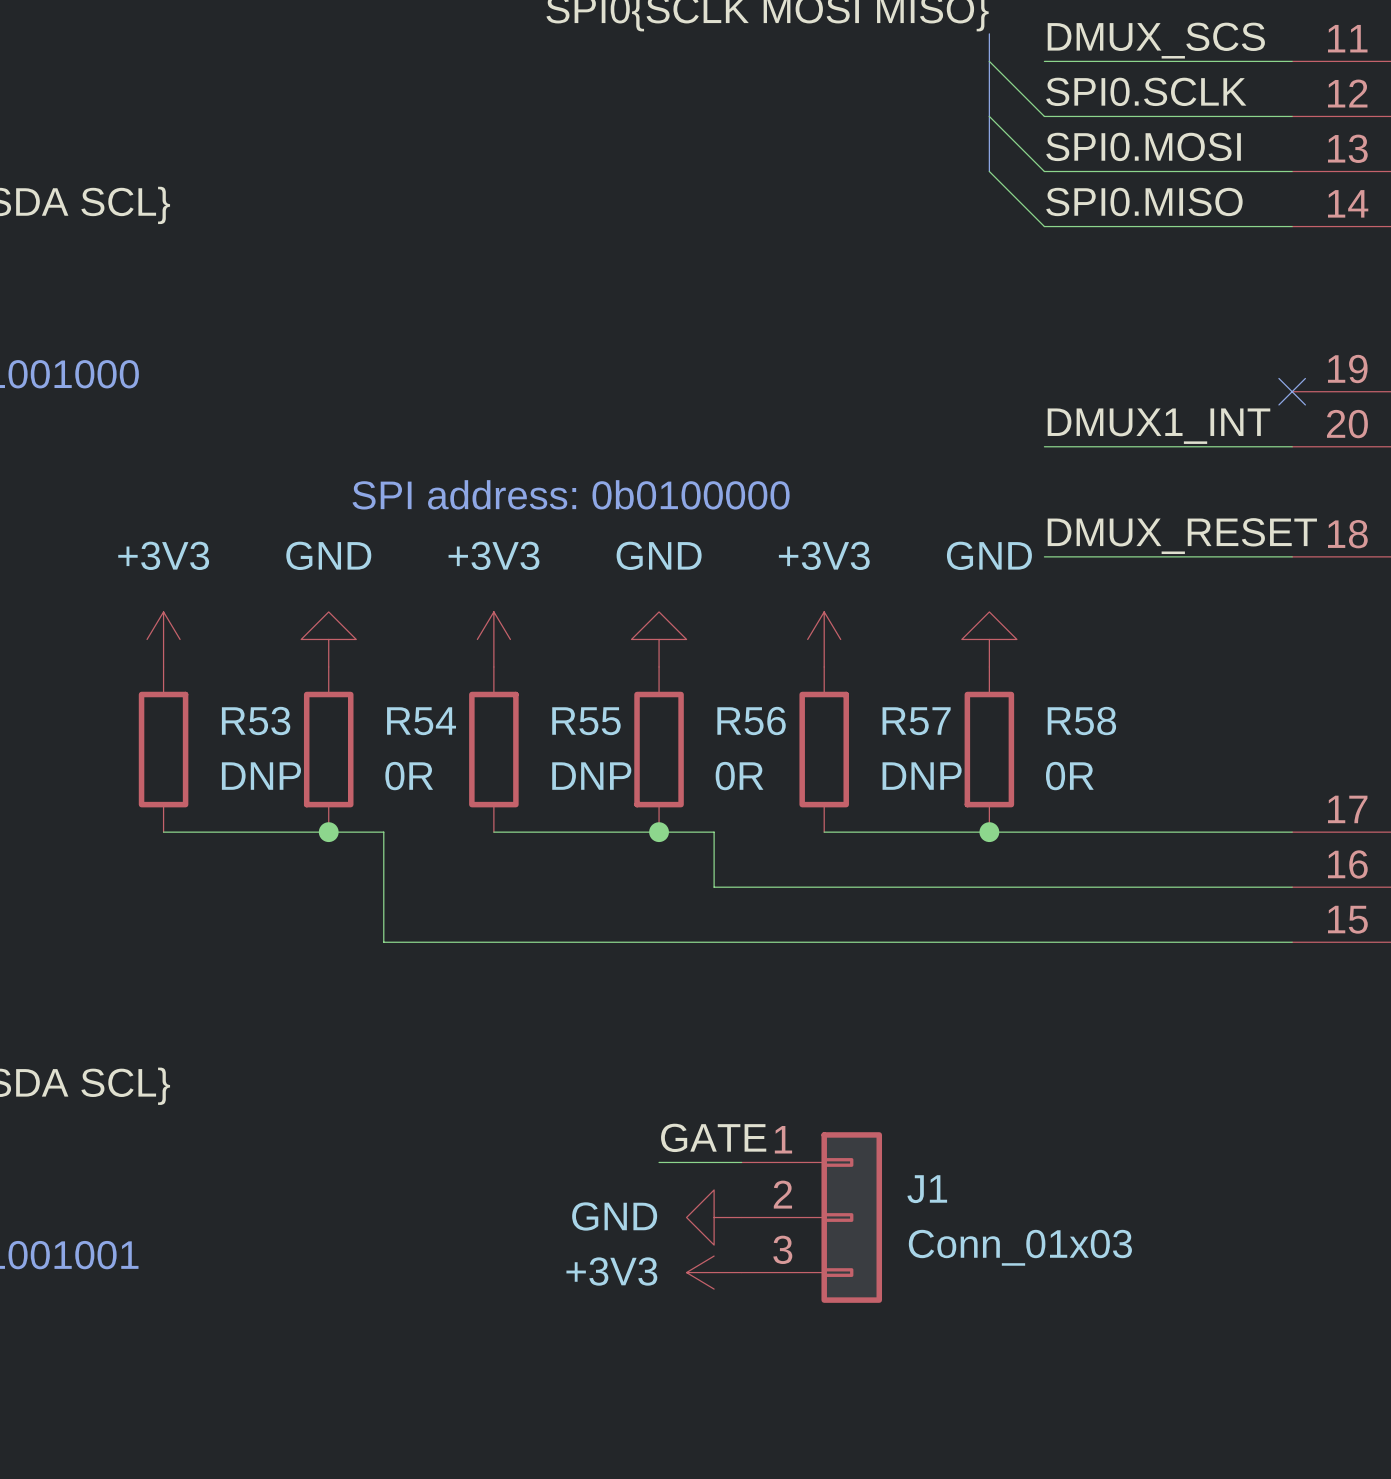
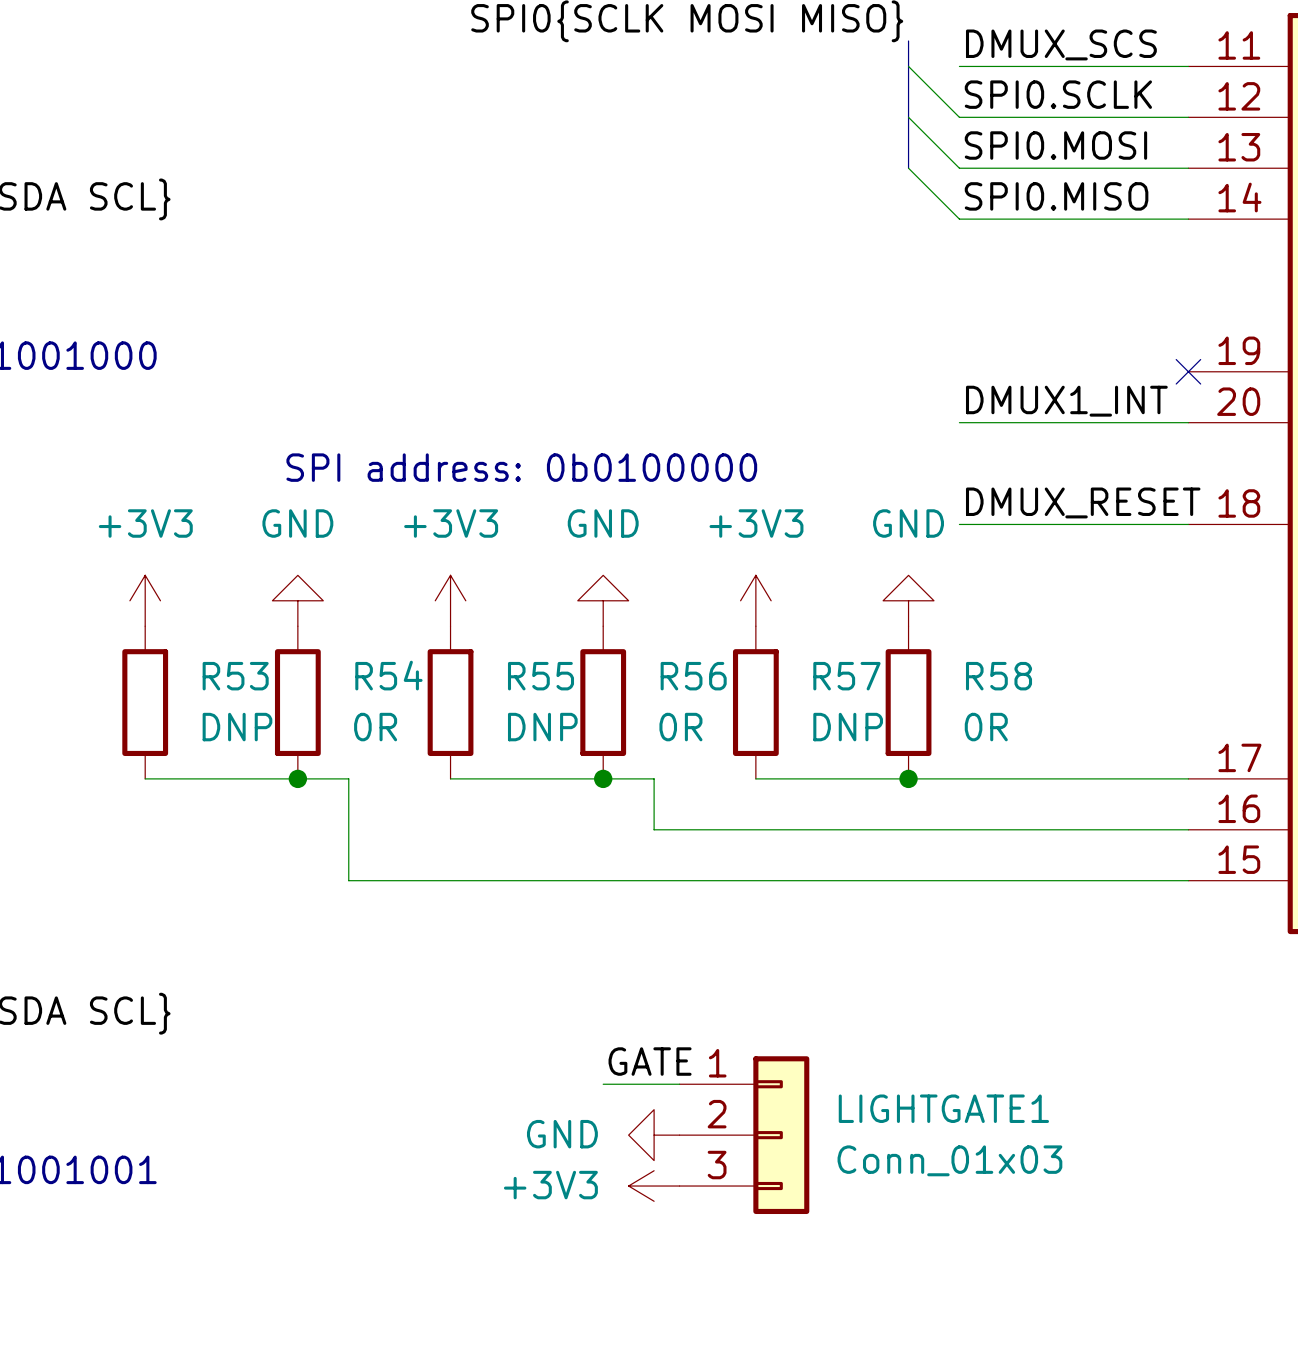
J1 name: J1 (927, 1189) -> LIGHTGATE1 (943, 1108)

